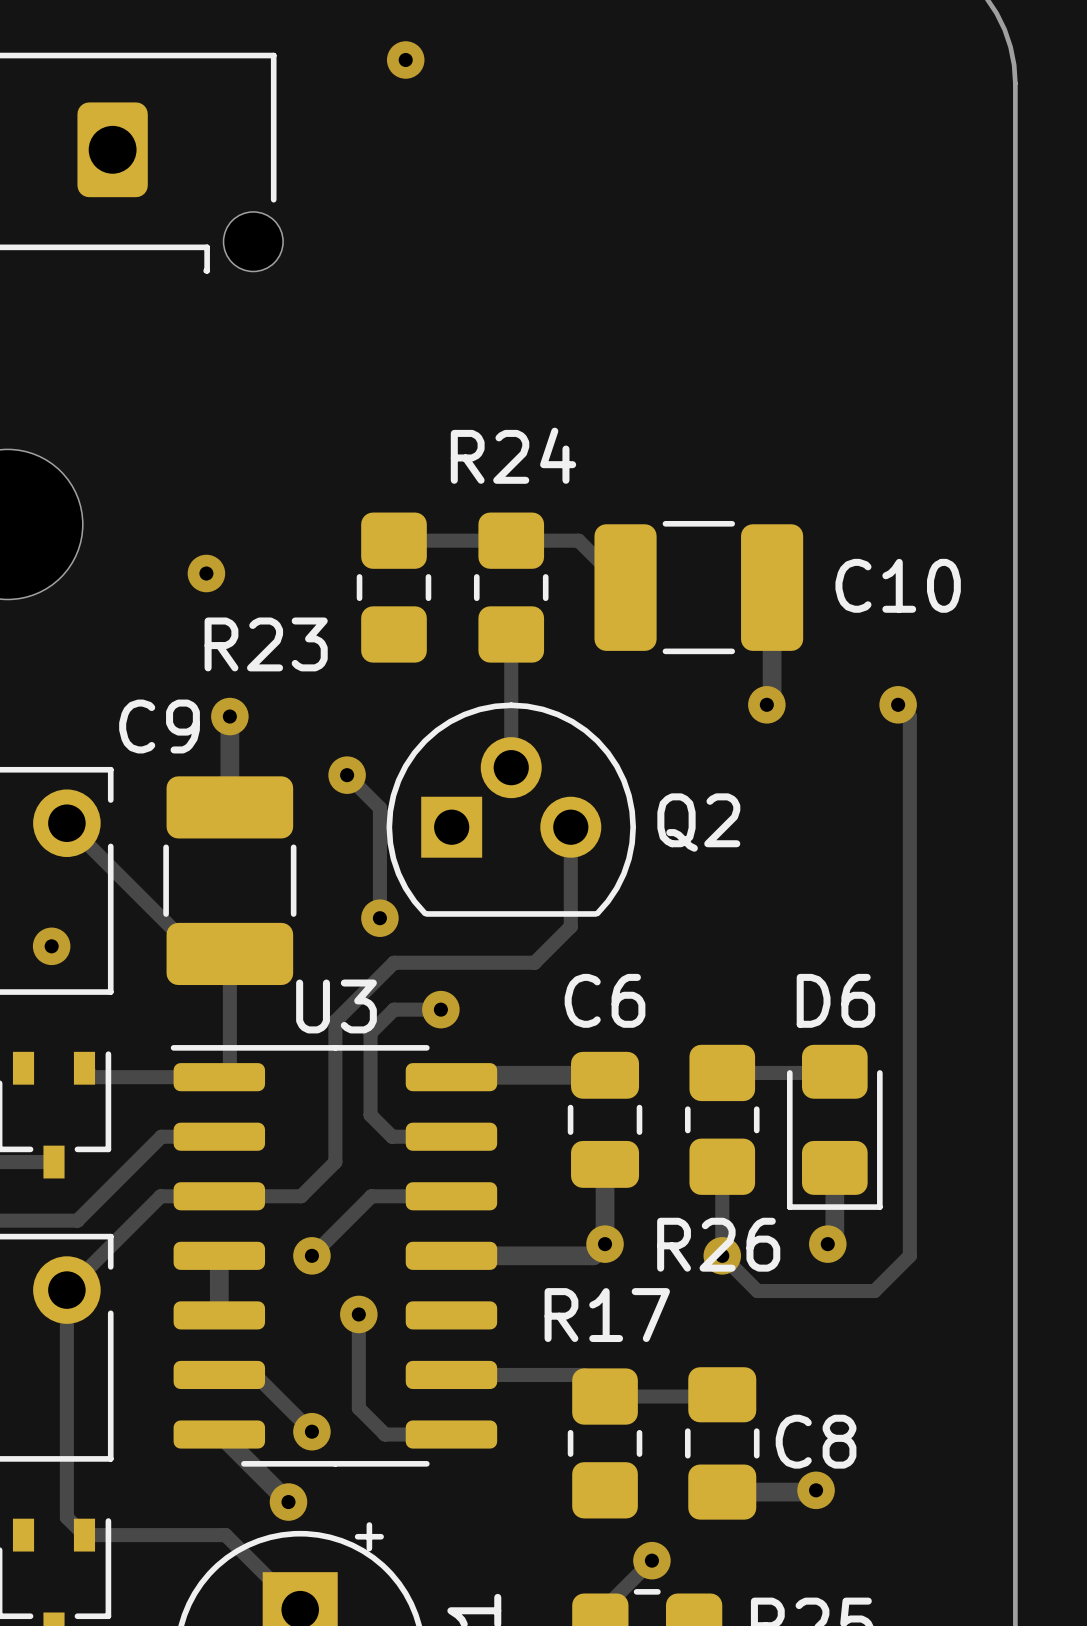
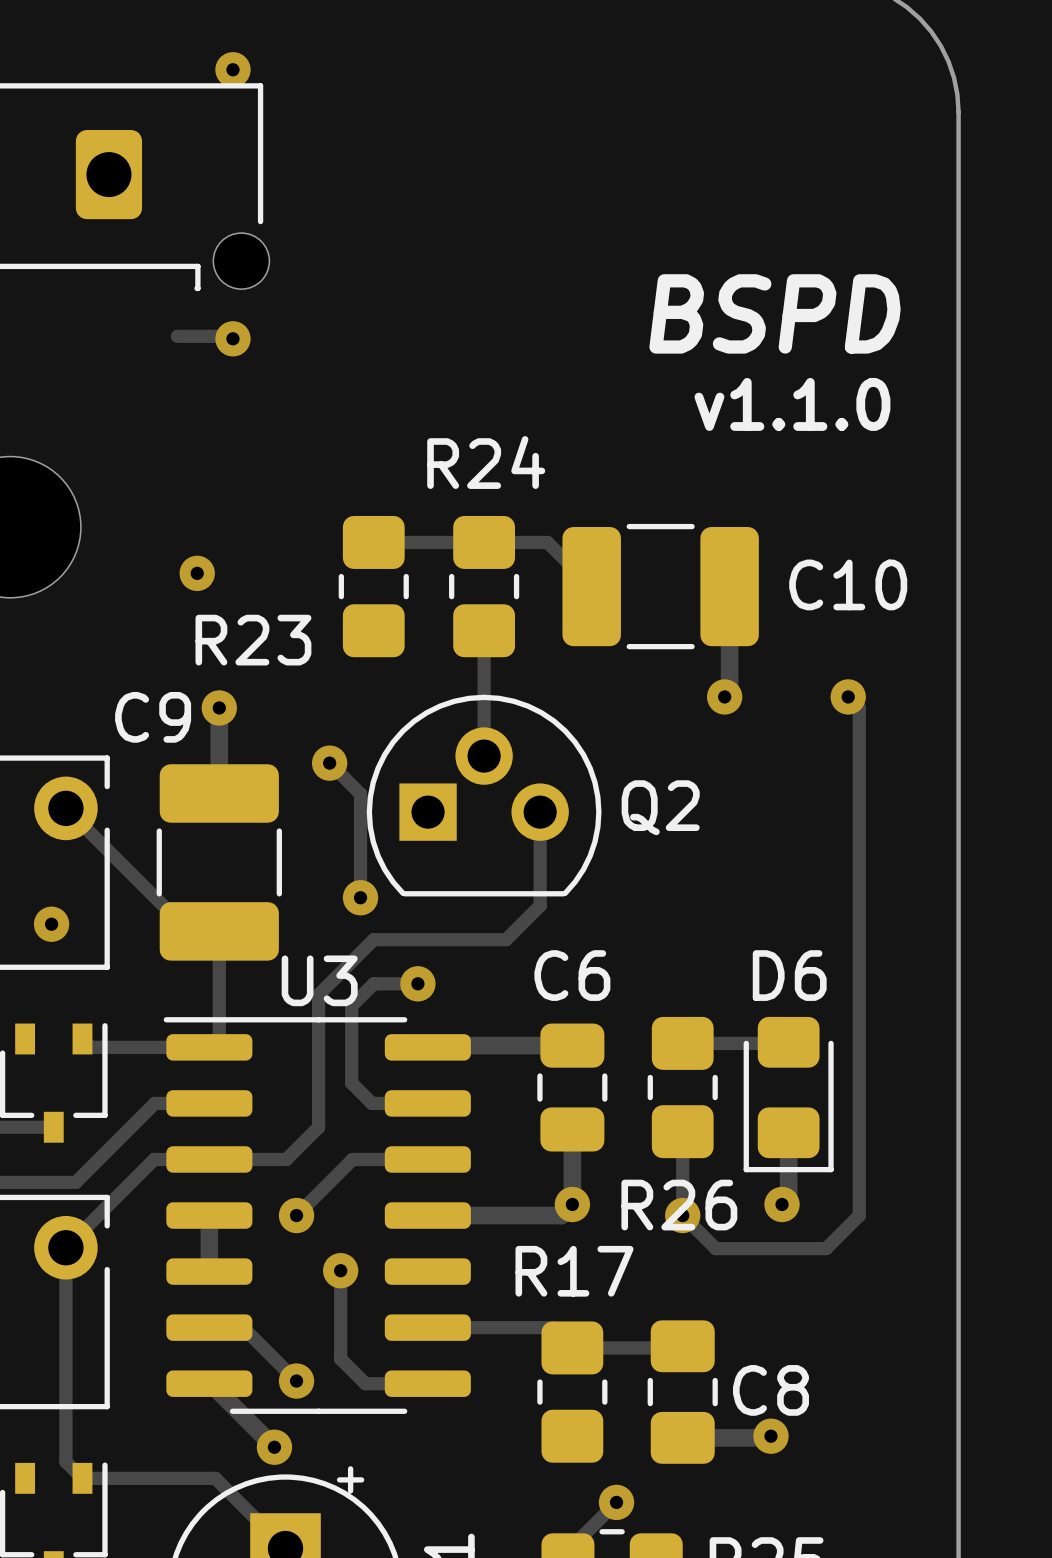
via: none -> (232, 69)
via: (405, 59) -> none
text: none -> BSPD (775, 313)
track: none -> (177, 336) (230, 336) (232, 338)
via: none -> (232, 338)
text: none -> v1.1.0 (792, 404)

